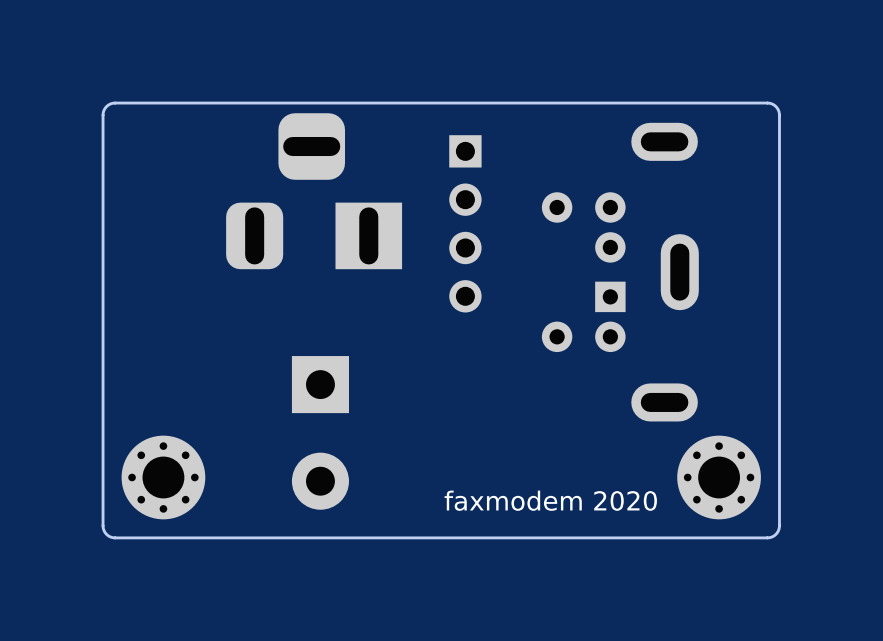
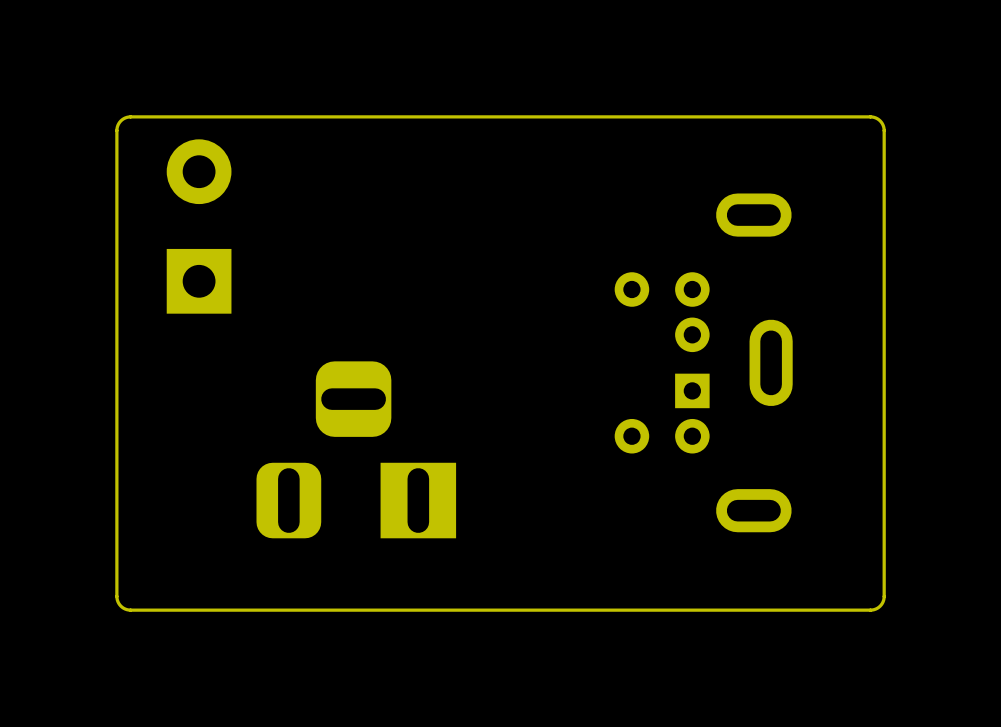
part position: (314, 191) -> (356, 449)
part: (465, 223) -> none
part position: (620, 272) -> (703, 362)
part rotation: 0° (320, 432) -> 180° (199, 226)
part position: (320, 432) -> (199, 226)
part: (163, 477) -> none
part: (719, 477) -> none
text: faxmodem 2020 (550, 500) -> none

